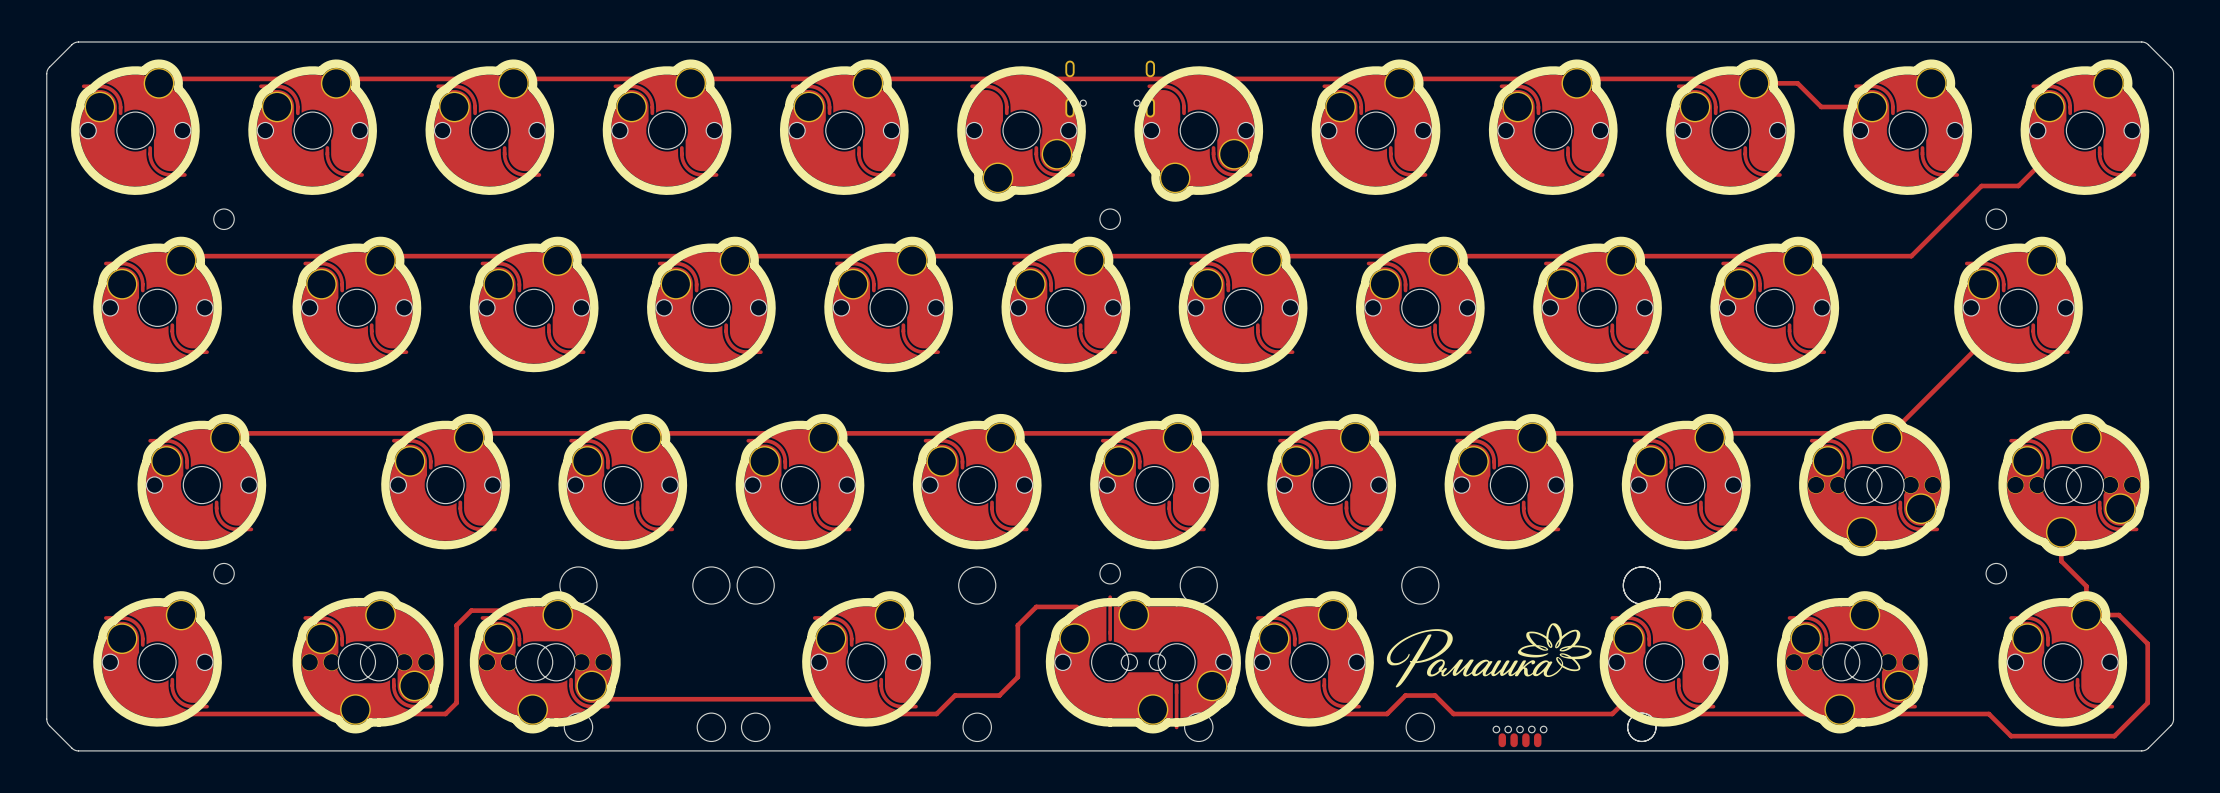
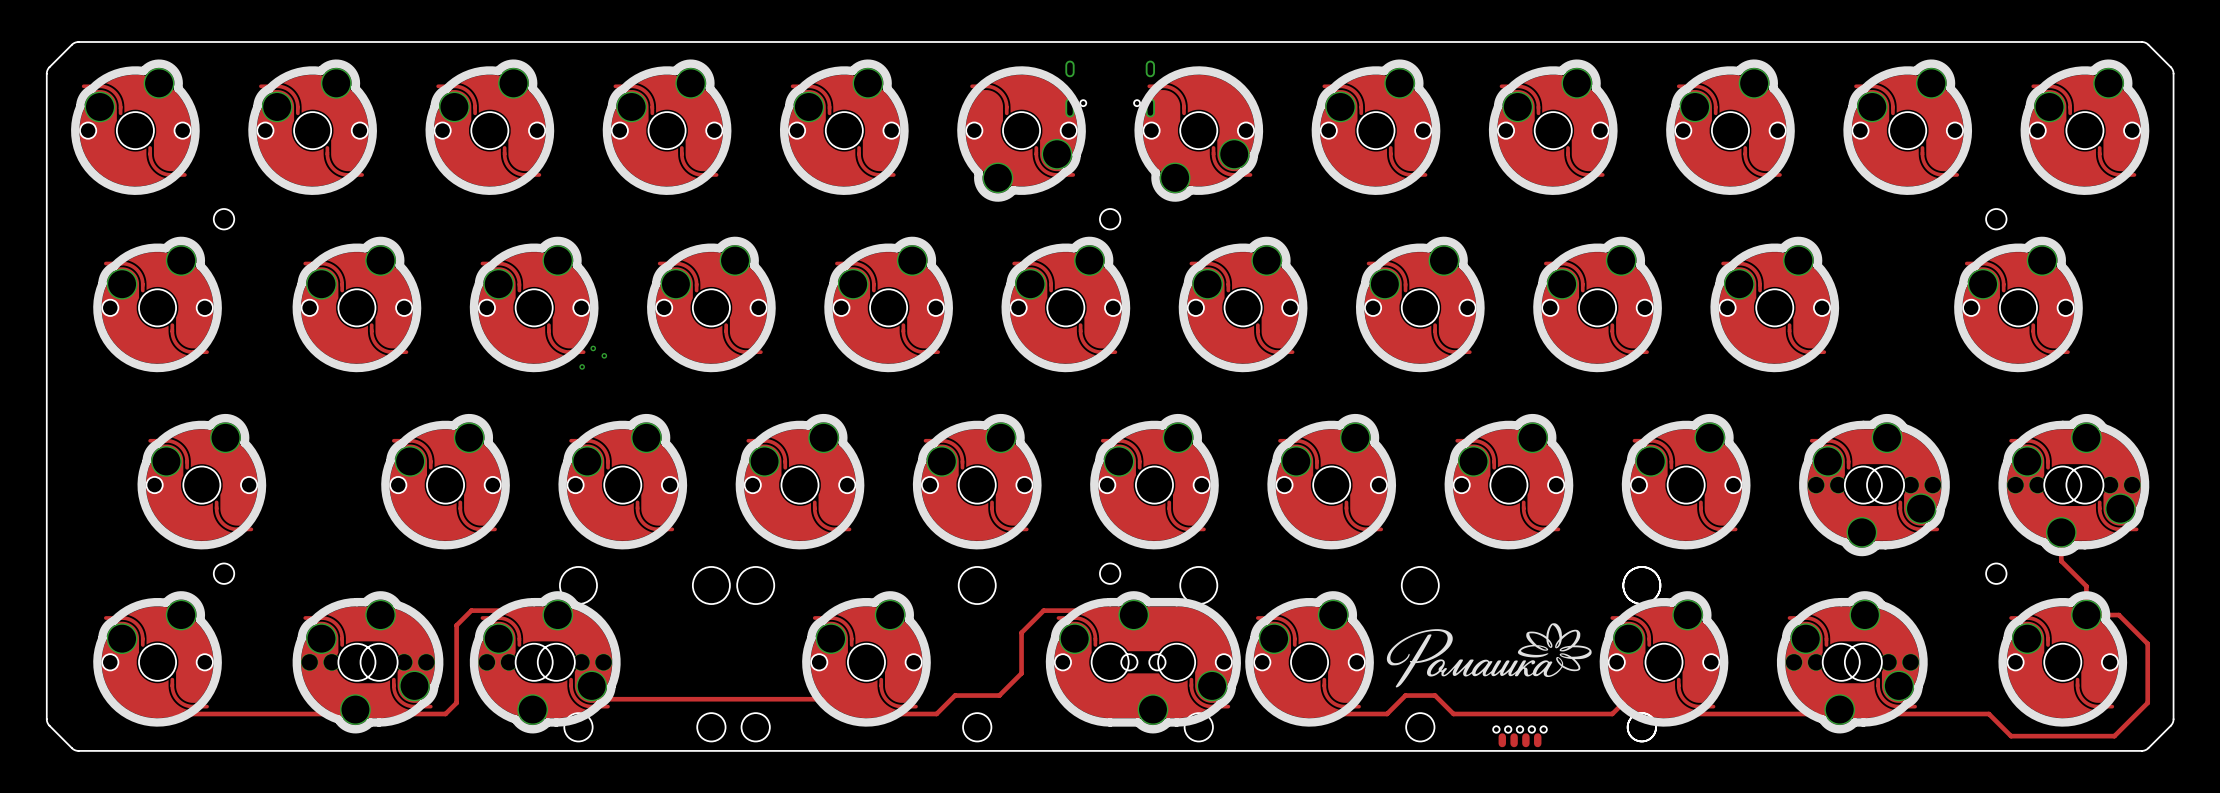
track: (157, 78) (1752, 78) -> none
track: (1754, 83) (1797, 83) (1821, 106) (1872, 106) -> none
track: (2055, 130) (2055, 149) (2018, 185) (1981, 185) (1911, 256) (1802, 256) -> none
track: (190, 256) (1796, 256) -> none
track: (1988, 307) (1988, 335) (1887, 437) -> none
via: none -> (593, 348)
via: none -> (604, 355)
via: none -> (582, 366)
track: (235, 433) (1896, 433) -> none
part footprint: [1045, 591, 1241, 734] -> [1045, 591, 1241, 734]
track: (1076, 606) (1036, 606) (1017, 625) (1017, 677) -> (1129, 610) (1043, 610) (1021, 632) (1021, 673) (1017, 677)

